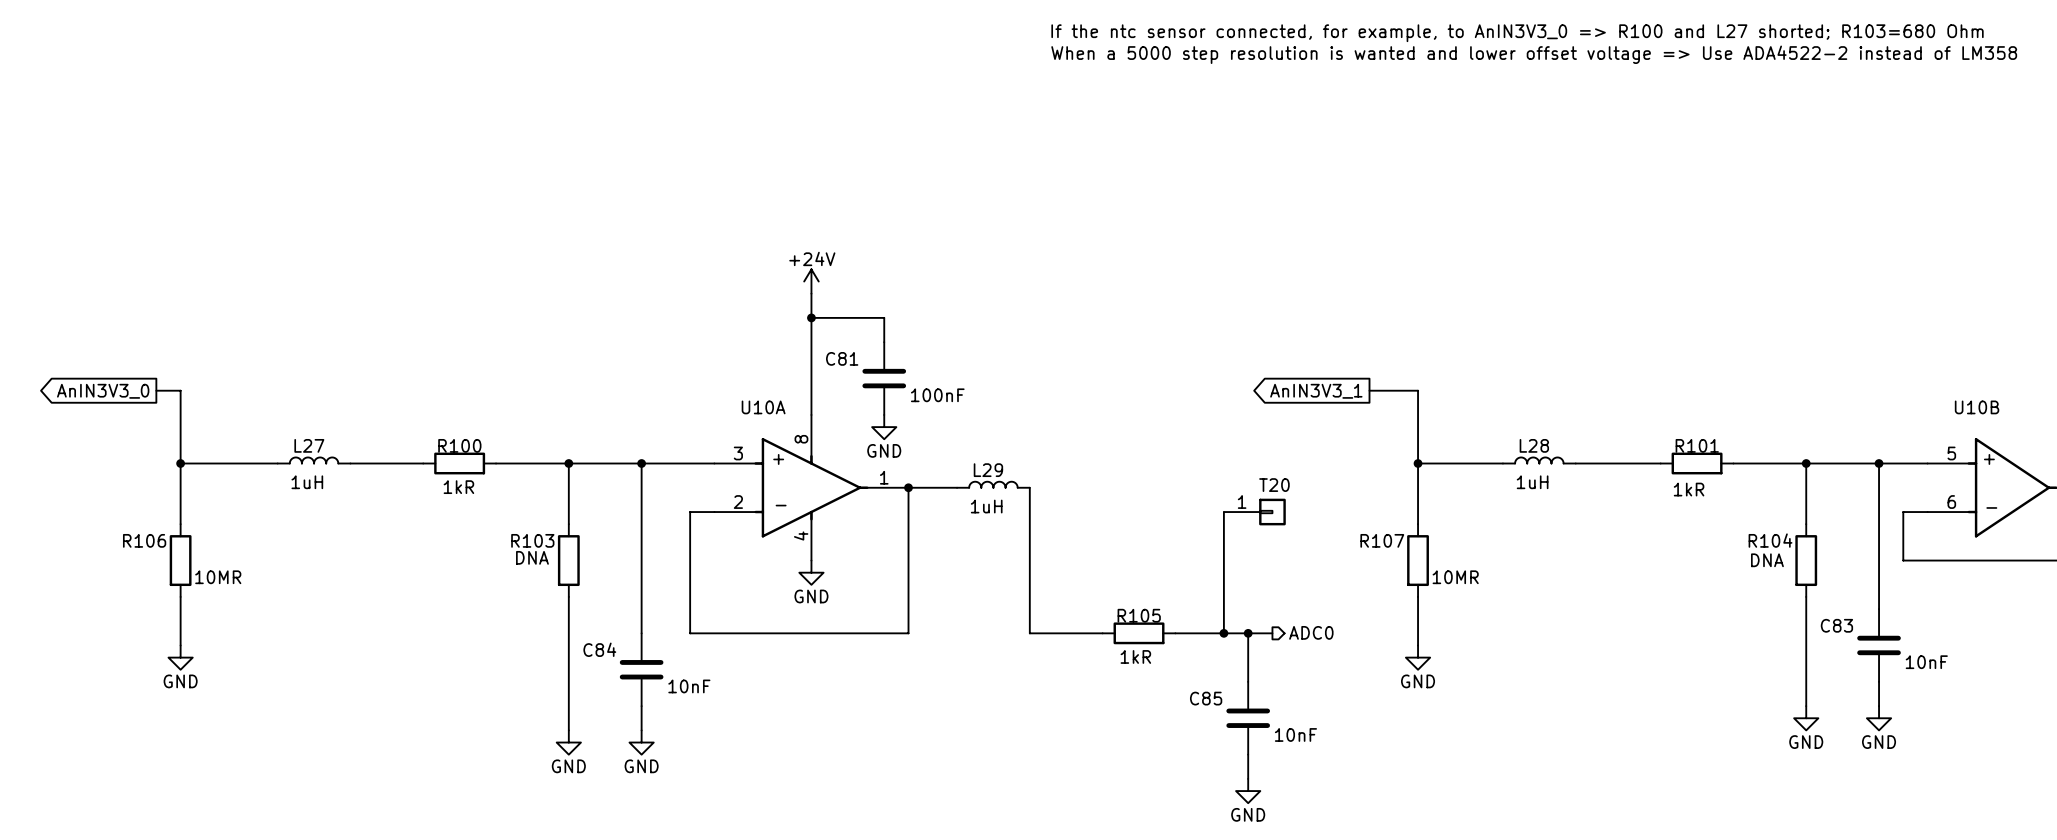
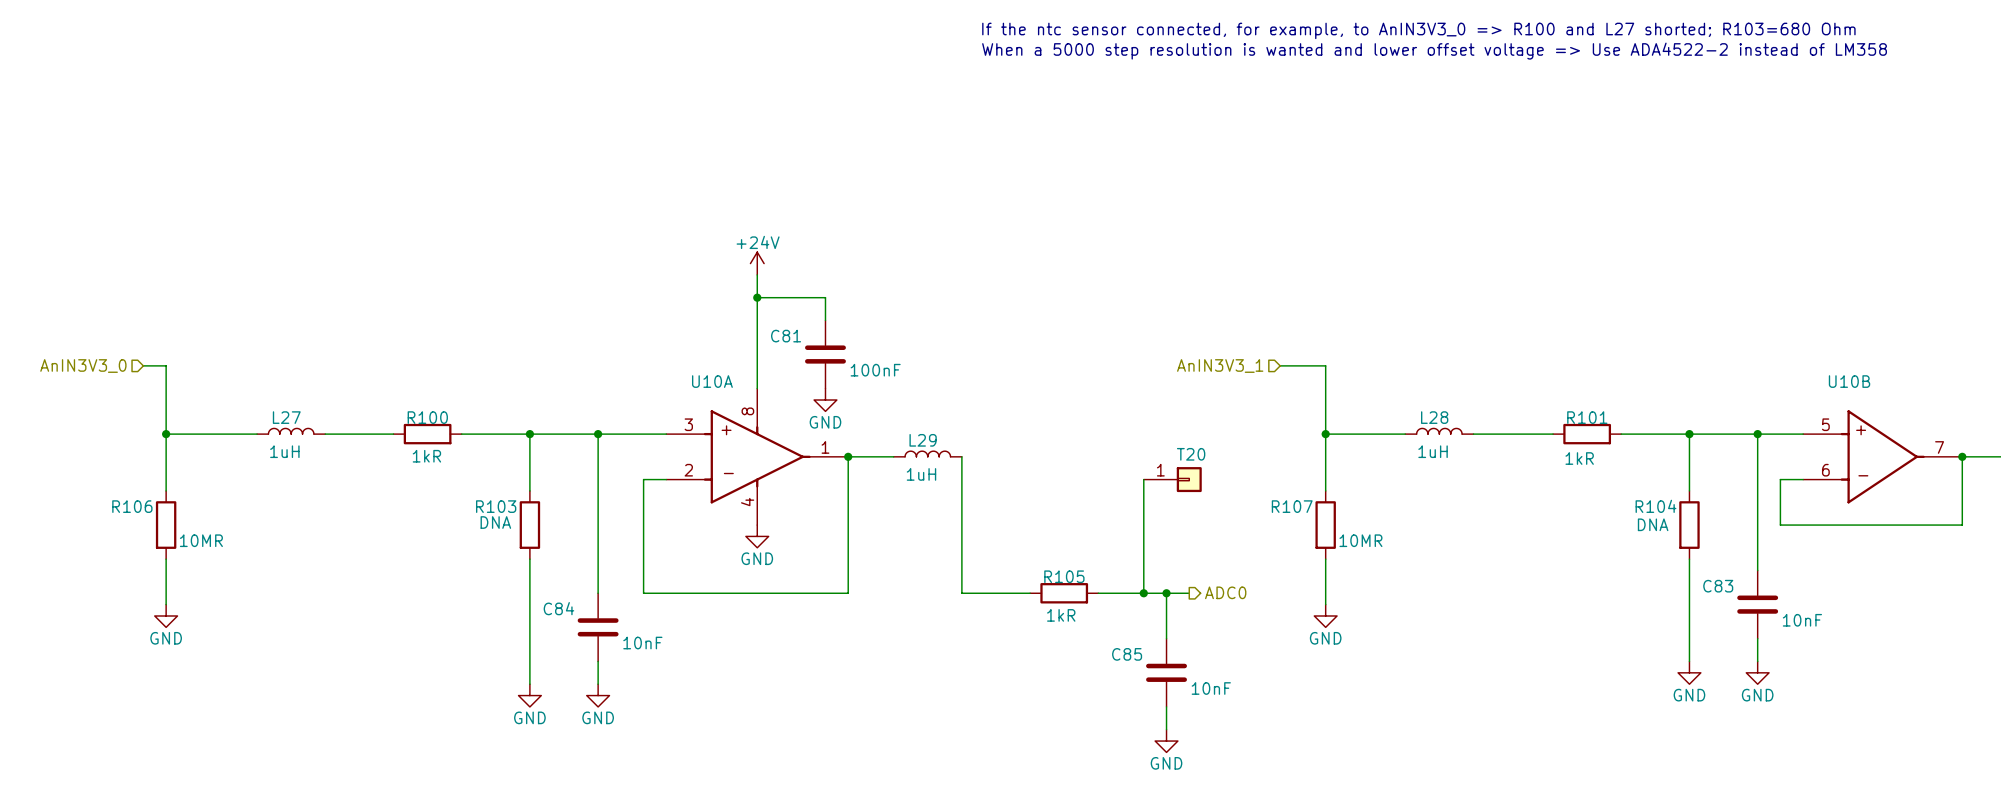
hierarchical label: none -> AnIN3V3_0 (83, 366)
hierarchical label: none -> AnIN3V3_1 (1220, 366)
global label: AnIN3V3_0 (103, 391) -> none
global label: AnIN3V3_1 (1316, 391) -> none

